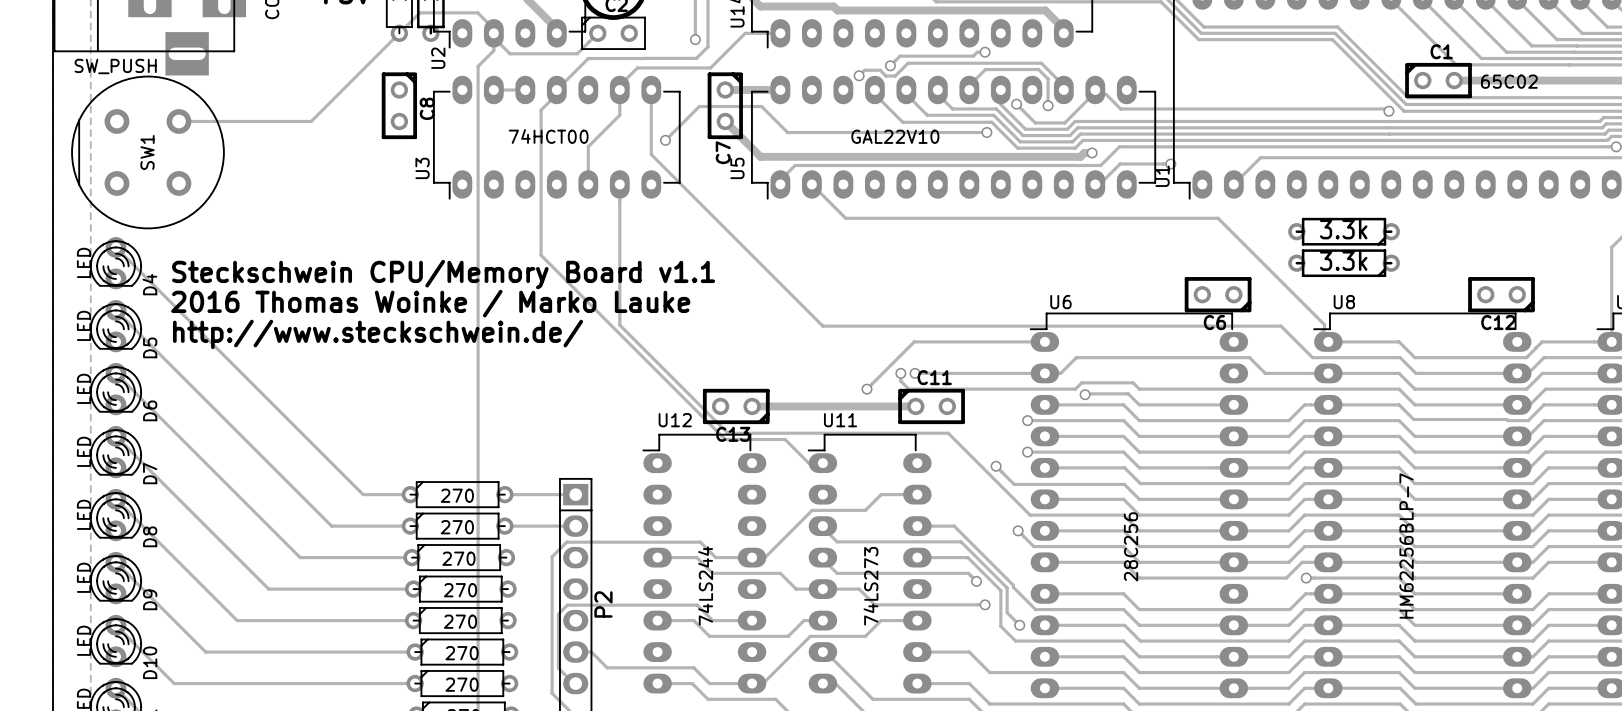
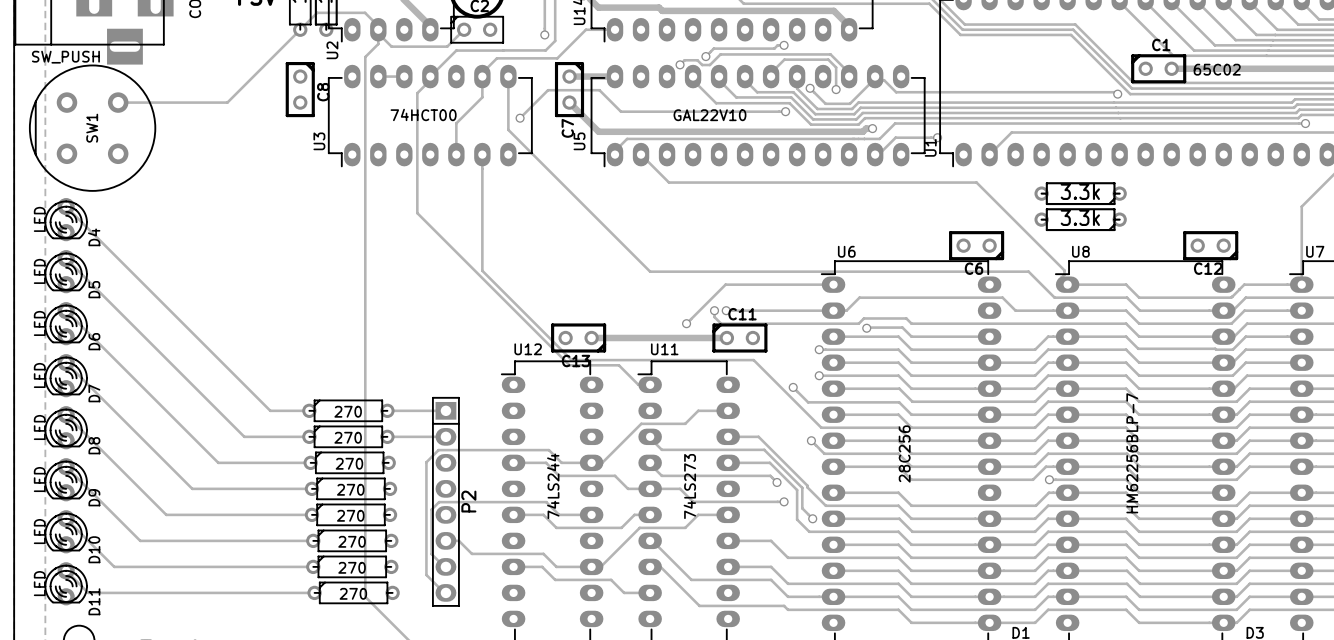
text: Steckschwein CPU/Memory Board v1.1 (443, 274) -> none
text: 2016 Thomas Woinke / Marko Lauke (430, 303) -> none
text: http://www.steckschwein.de/ (378, 334) -> none

